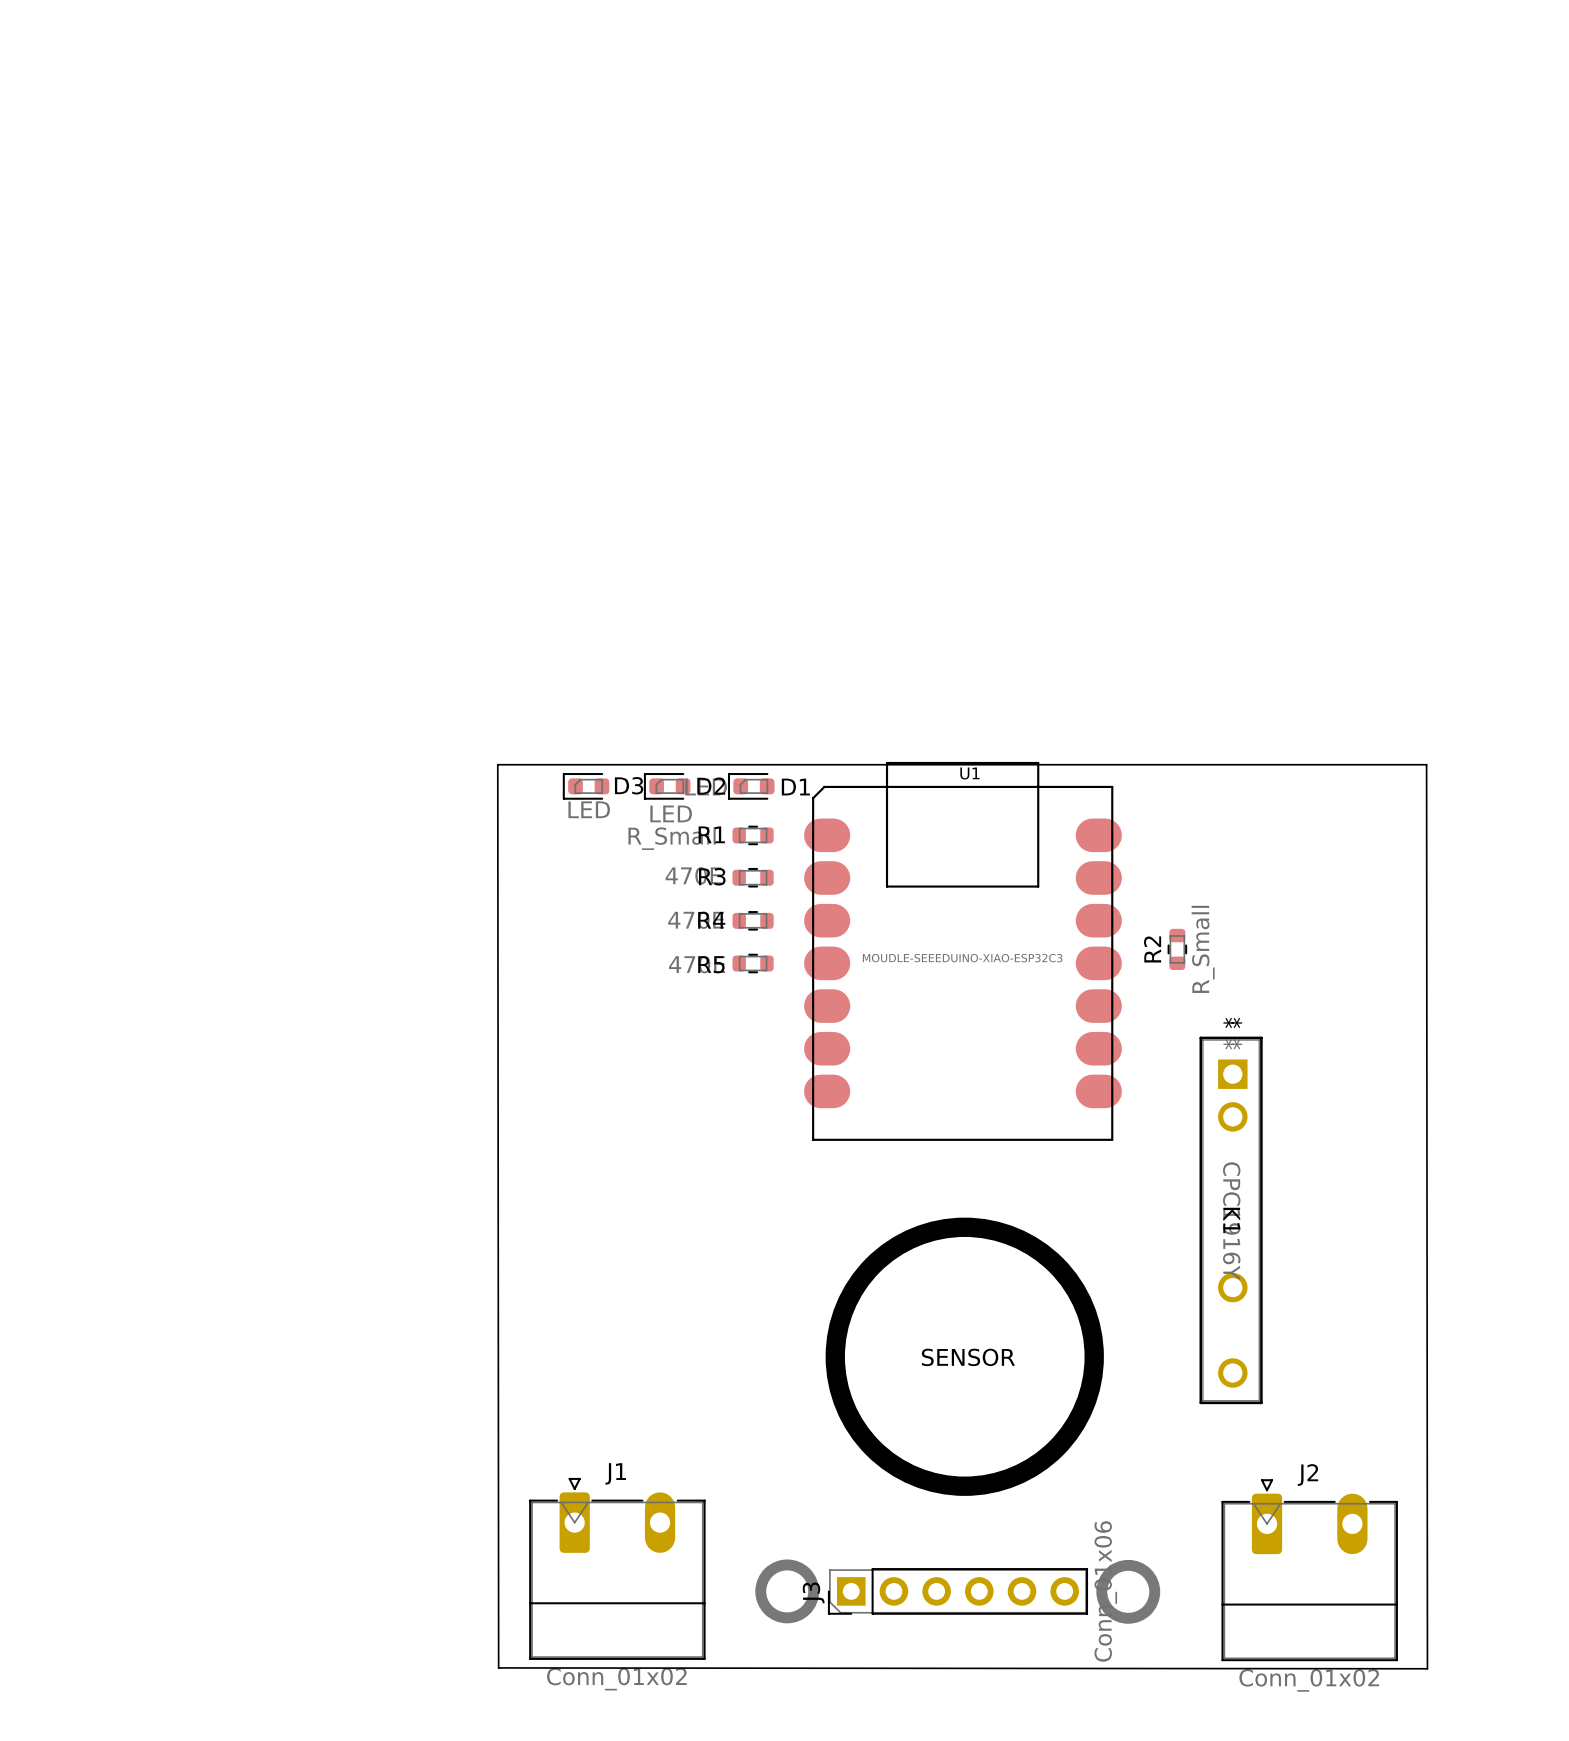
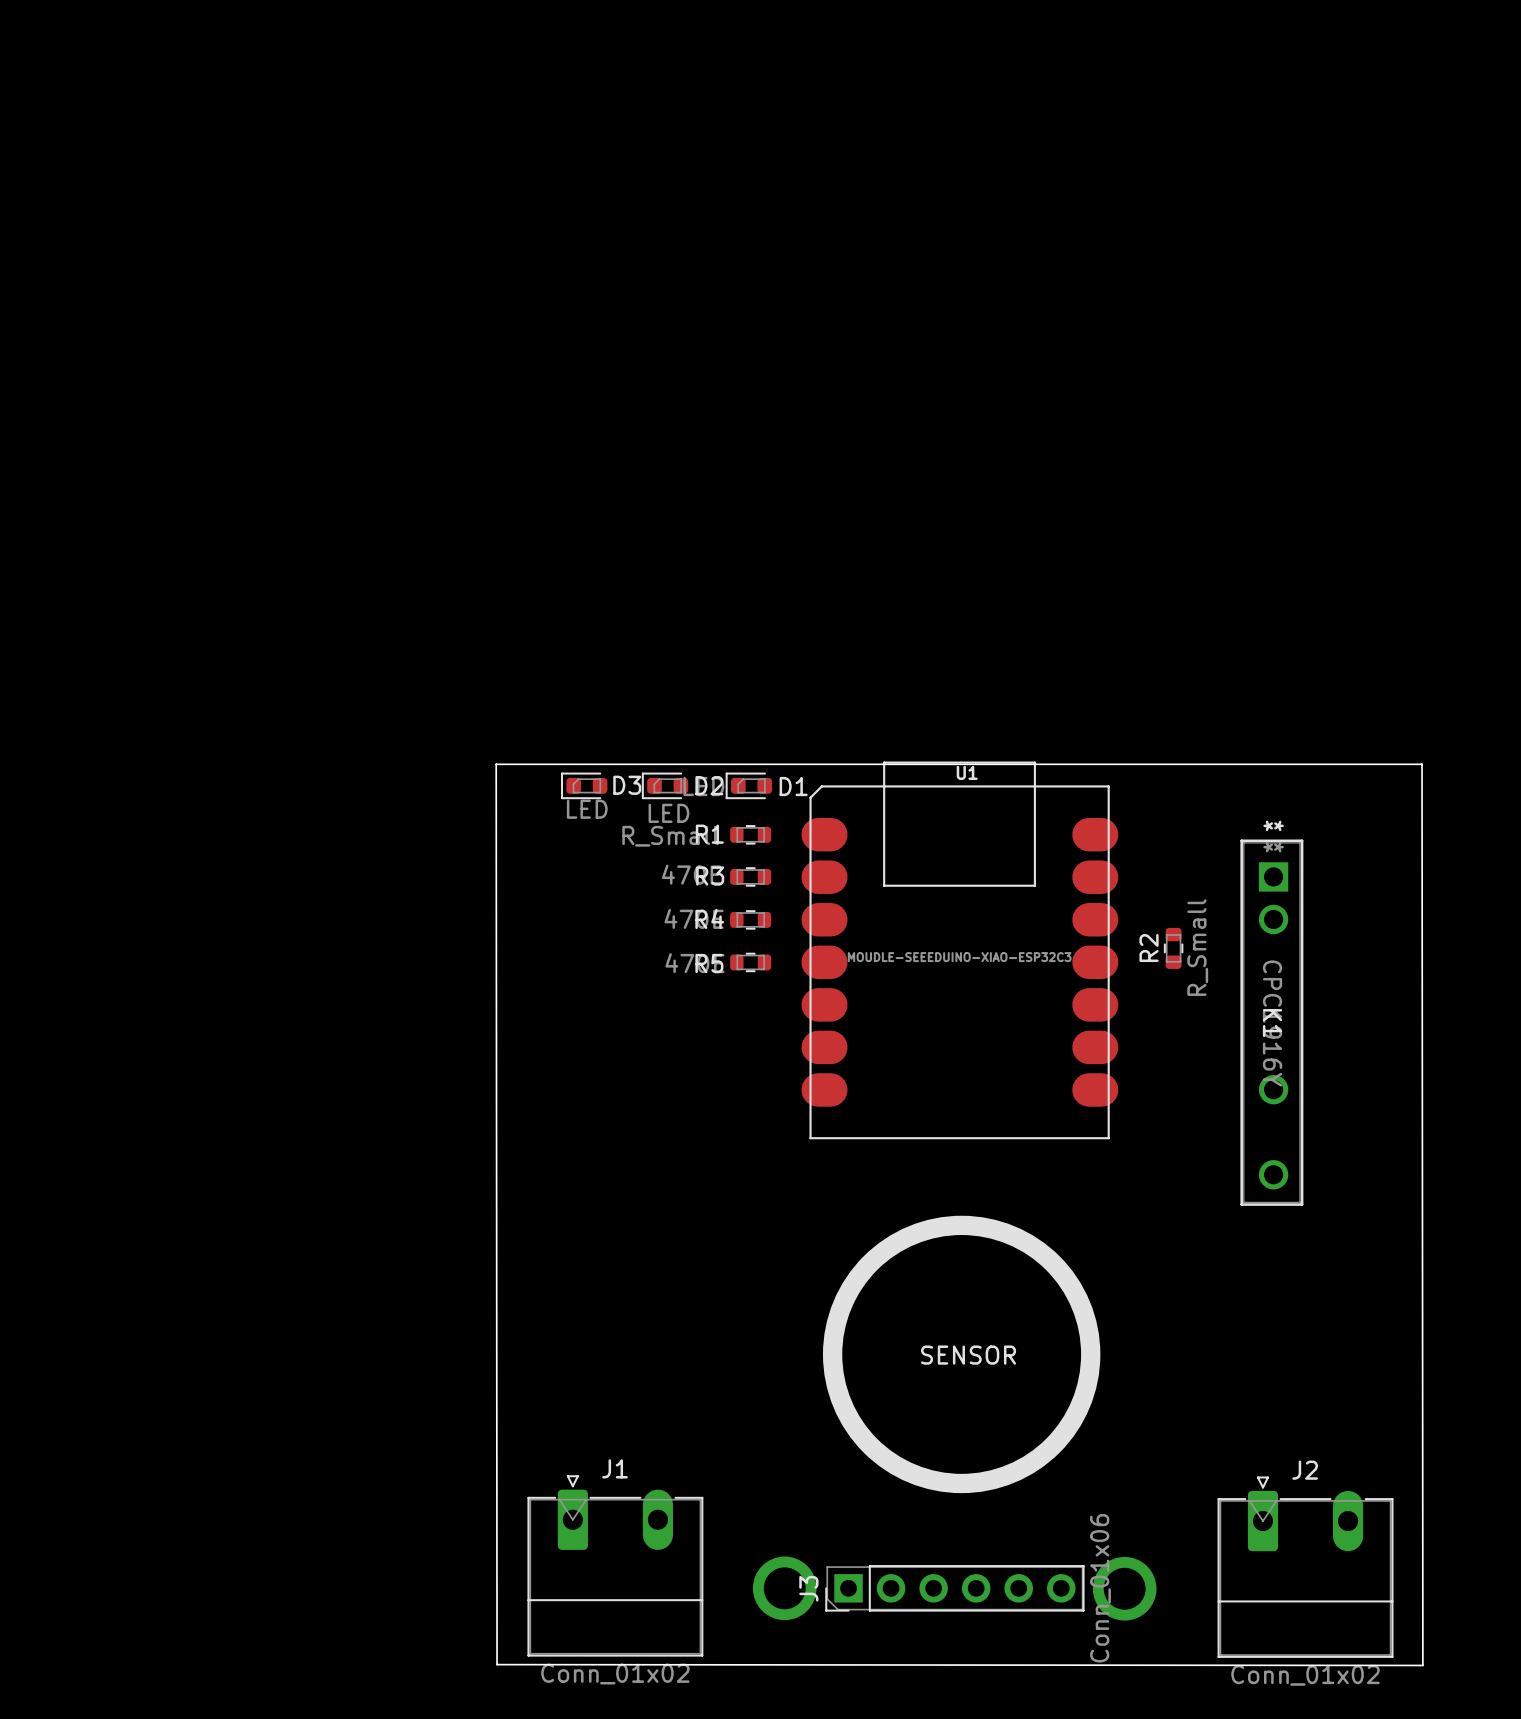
K1 position: (1231, 1220) -> (1271, 1022)

